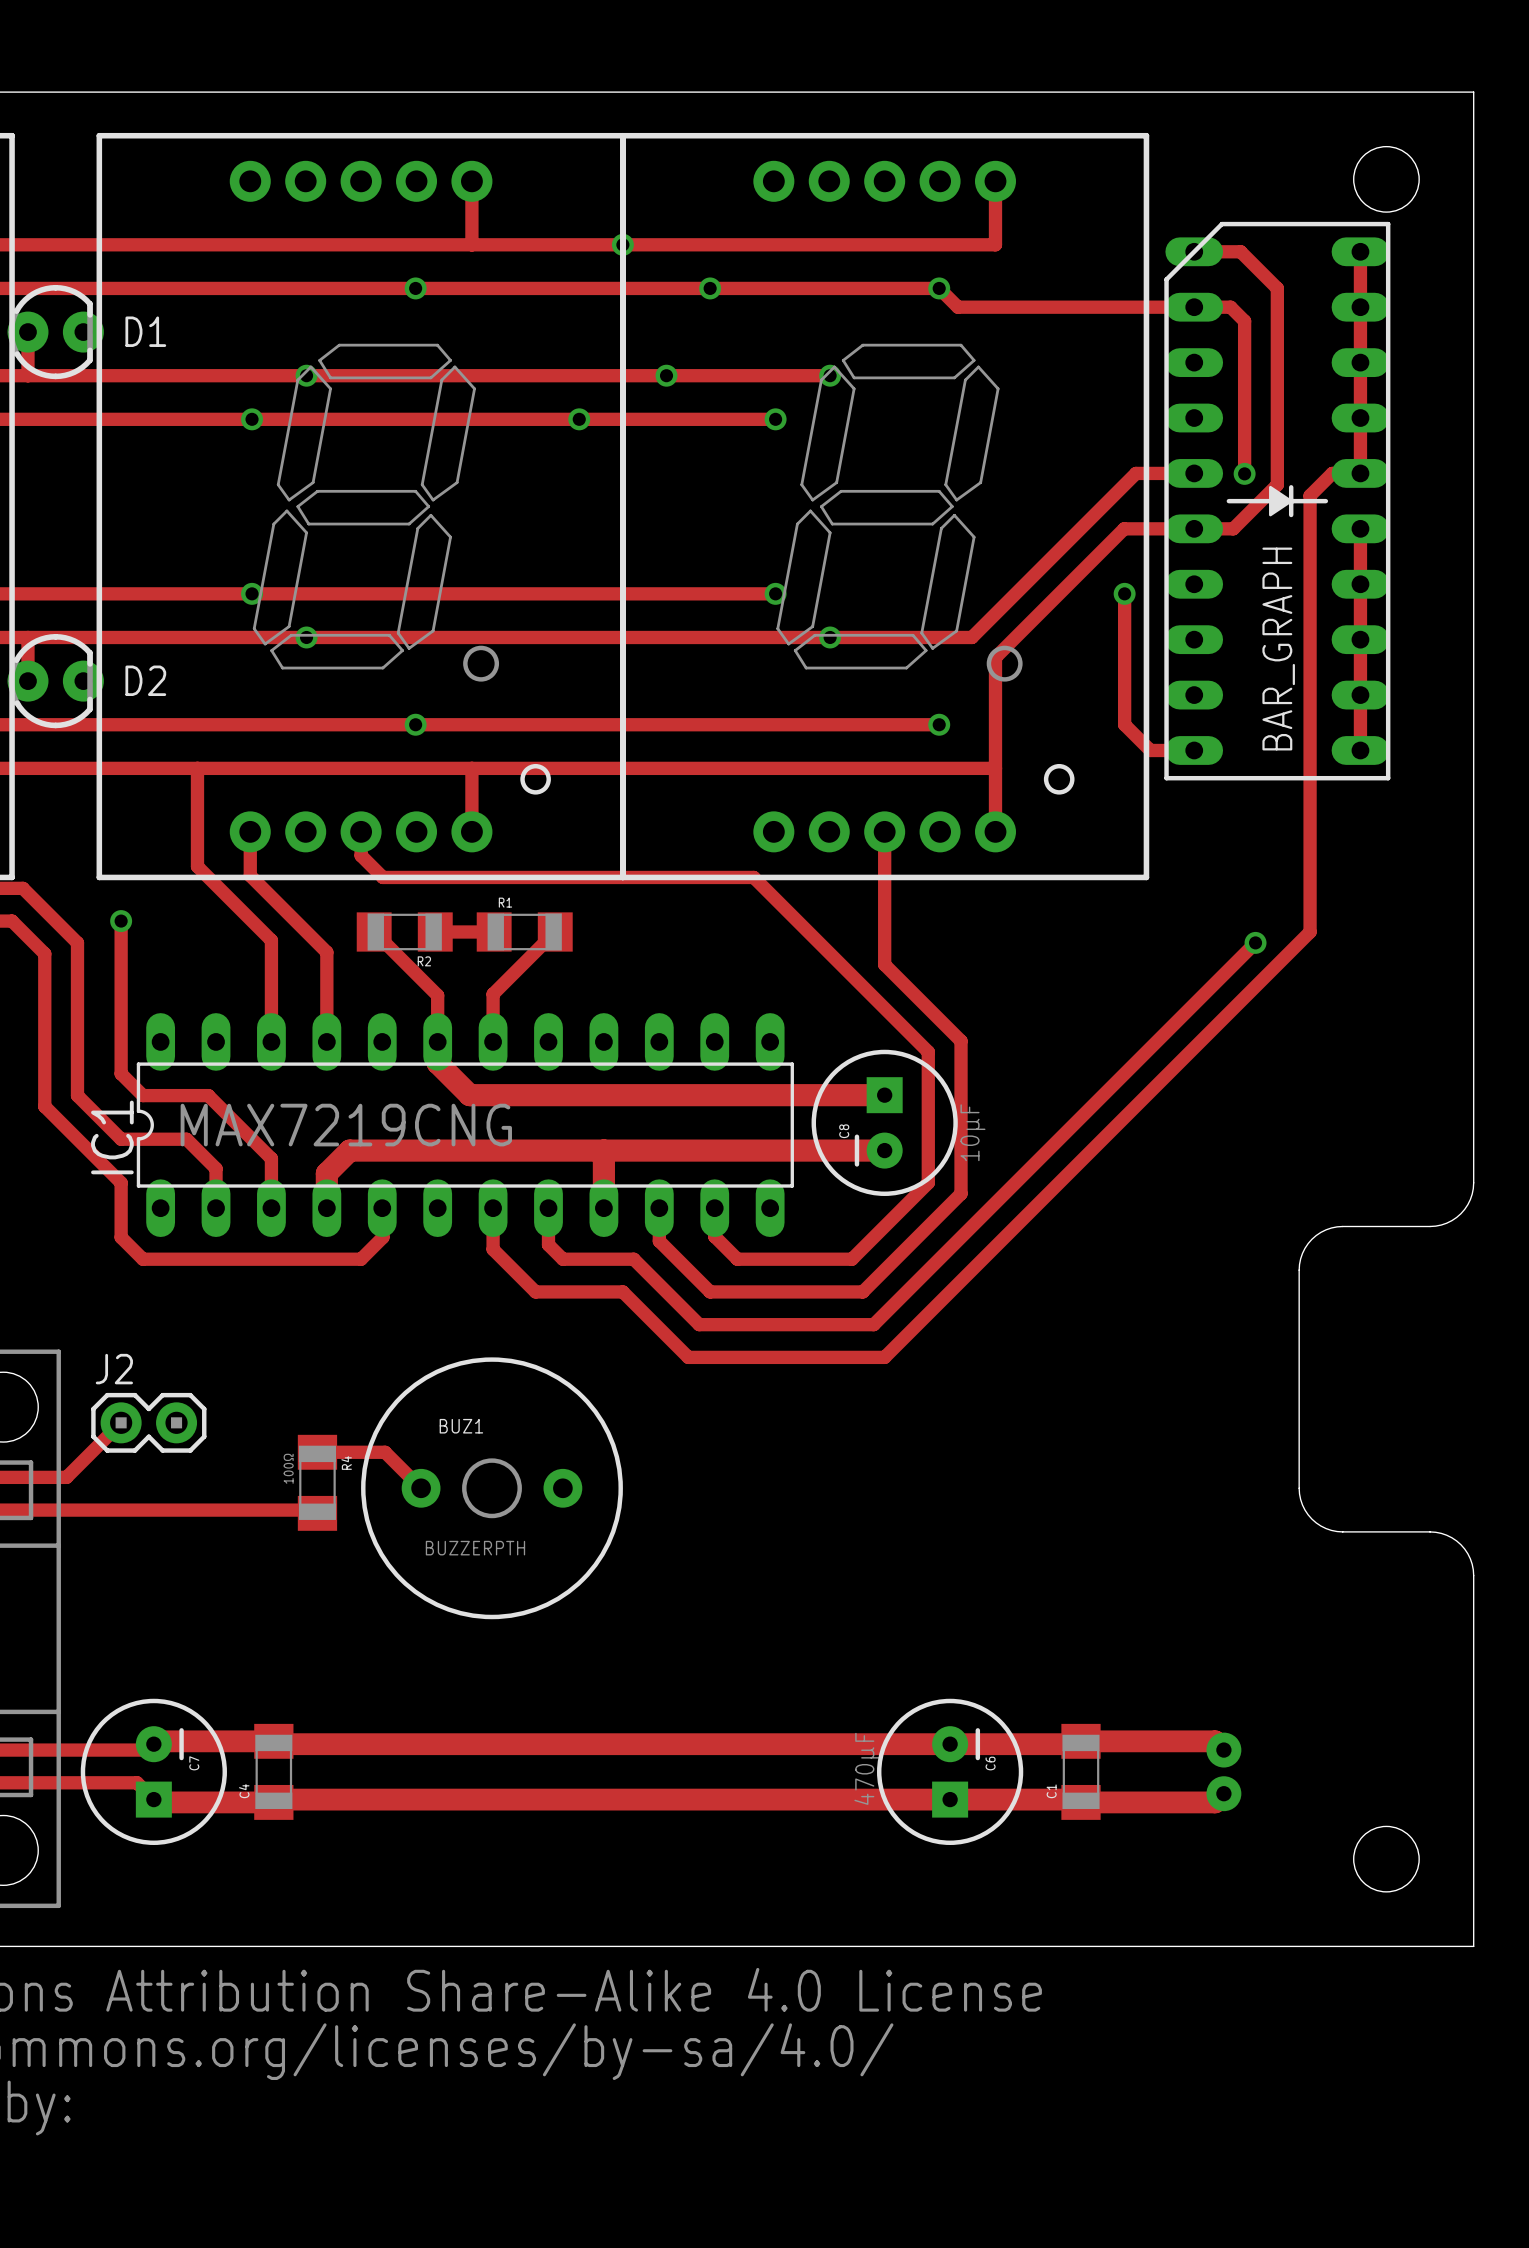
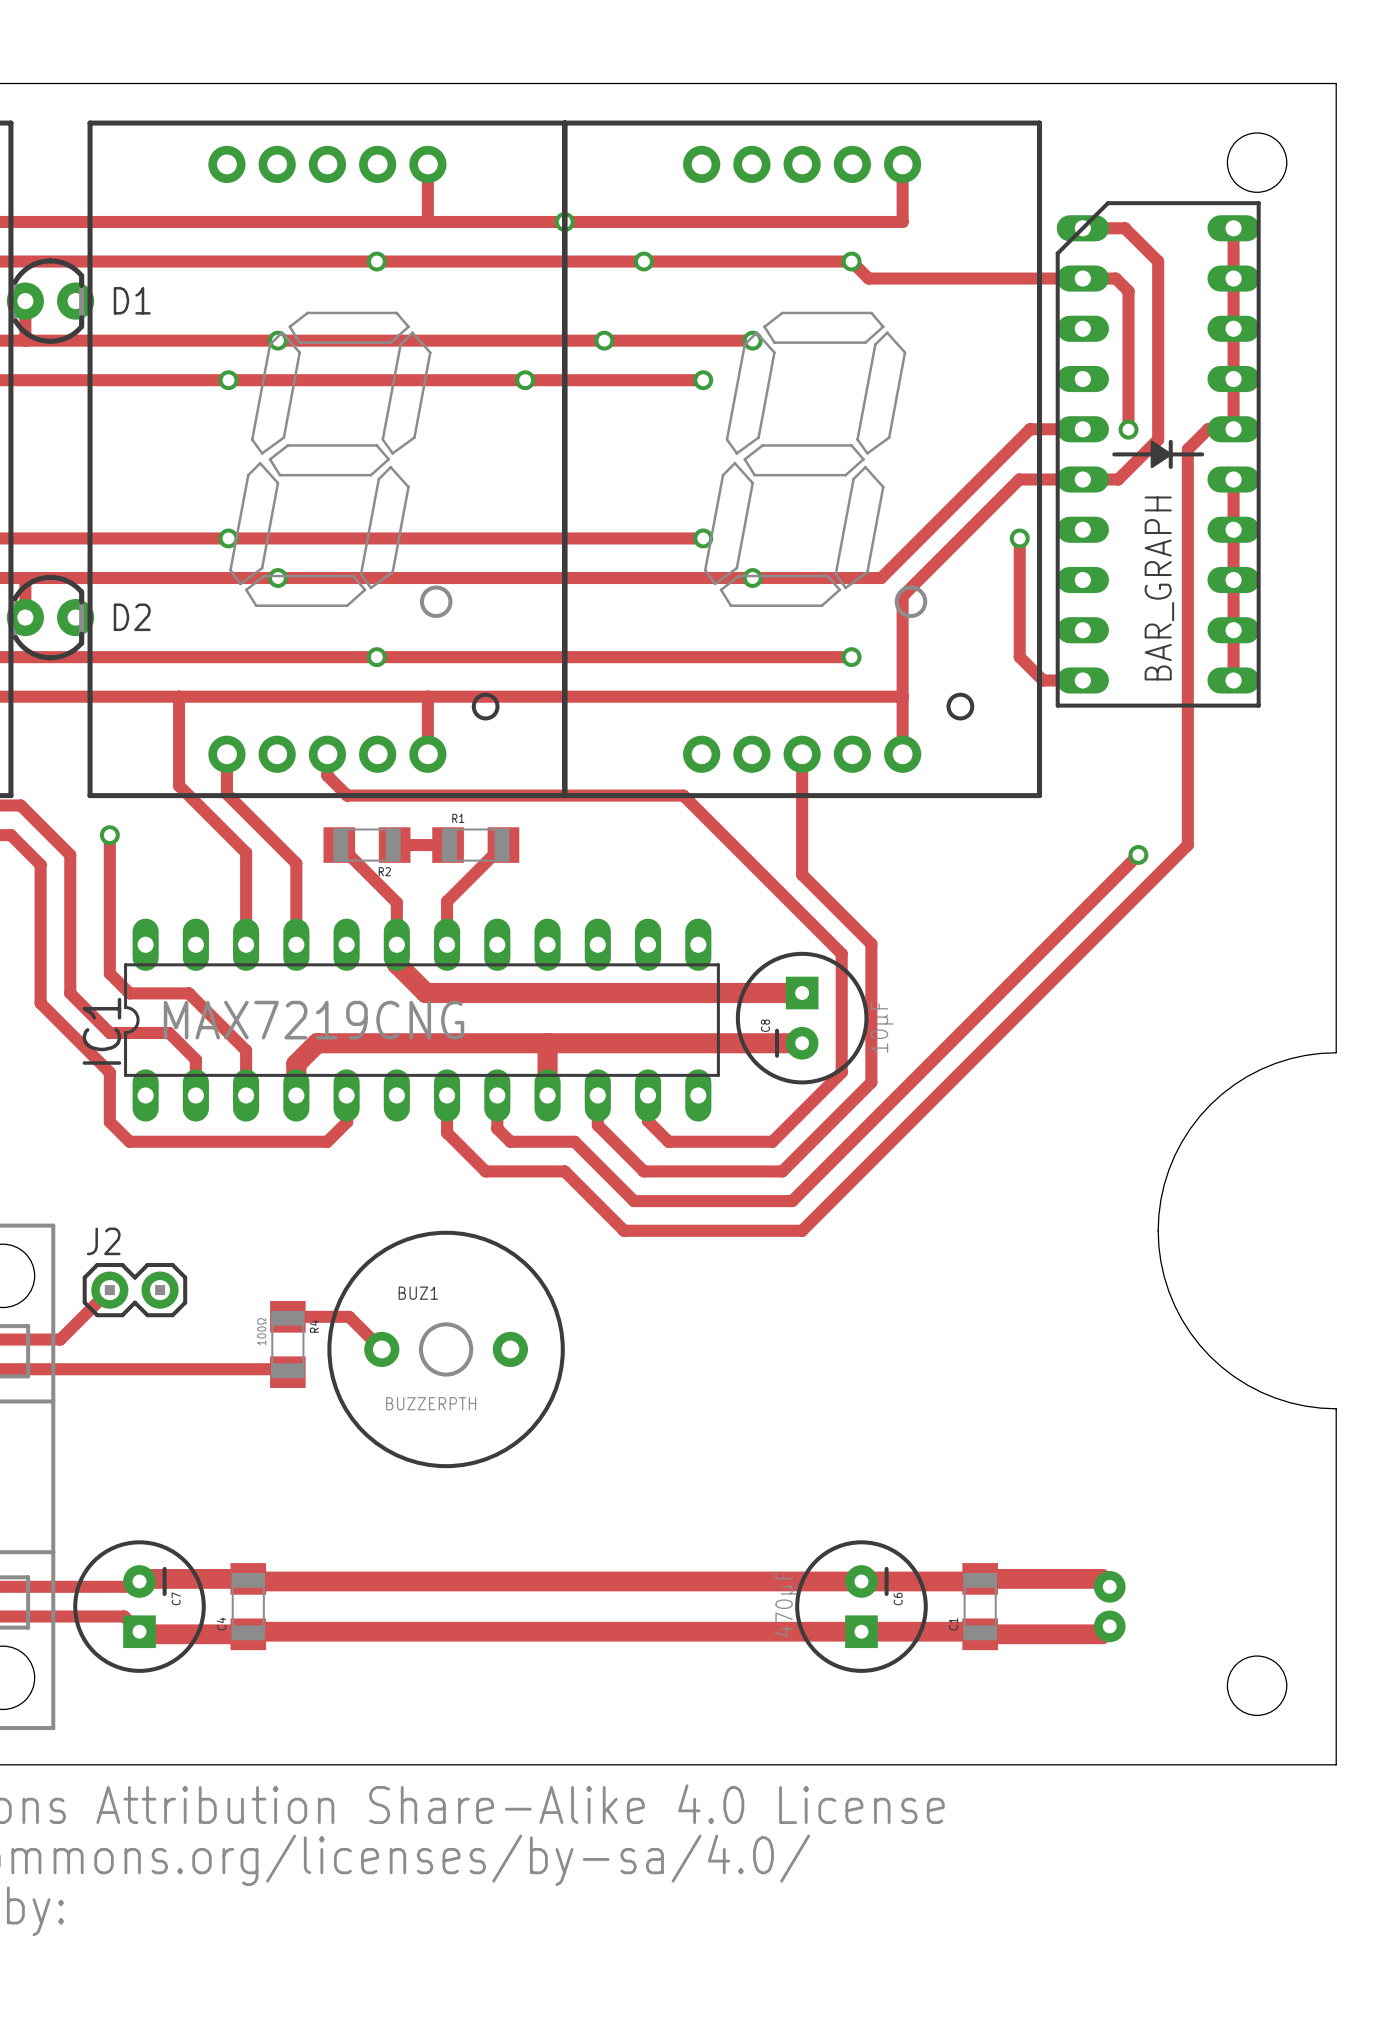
board edge: (1473, 1161) (1473, 1188) (1470, 1199) (1460, 1213) (1451, 1220) (1430, 1226) (1331, 1227) (1320, 1232) (1308, 1243) (1302, 1253) (1299, 1270) (1299, 1488) (1305, 1510) (1320, 1526) (1337, 1531) (1430, 1531) (1446, 1535) (1460, 1544) (1467, 1553) (1473, 1575) -> (1336, 1052) (1305, 1055) (1260, 1069) (1234, 1084) (1210, 1104) (1190, 1128) (1174, 1155) (1160, 1199) (1158, 1230) (1160, 1261) (1168, 1291) (1182, 1319) (1199, 1345) (1234, 1376) (1260, 1392) (1305, 1406) (1336, 1408) (1336, 1428)

